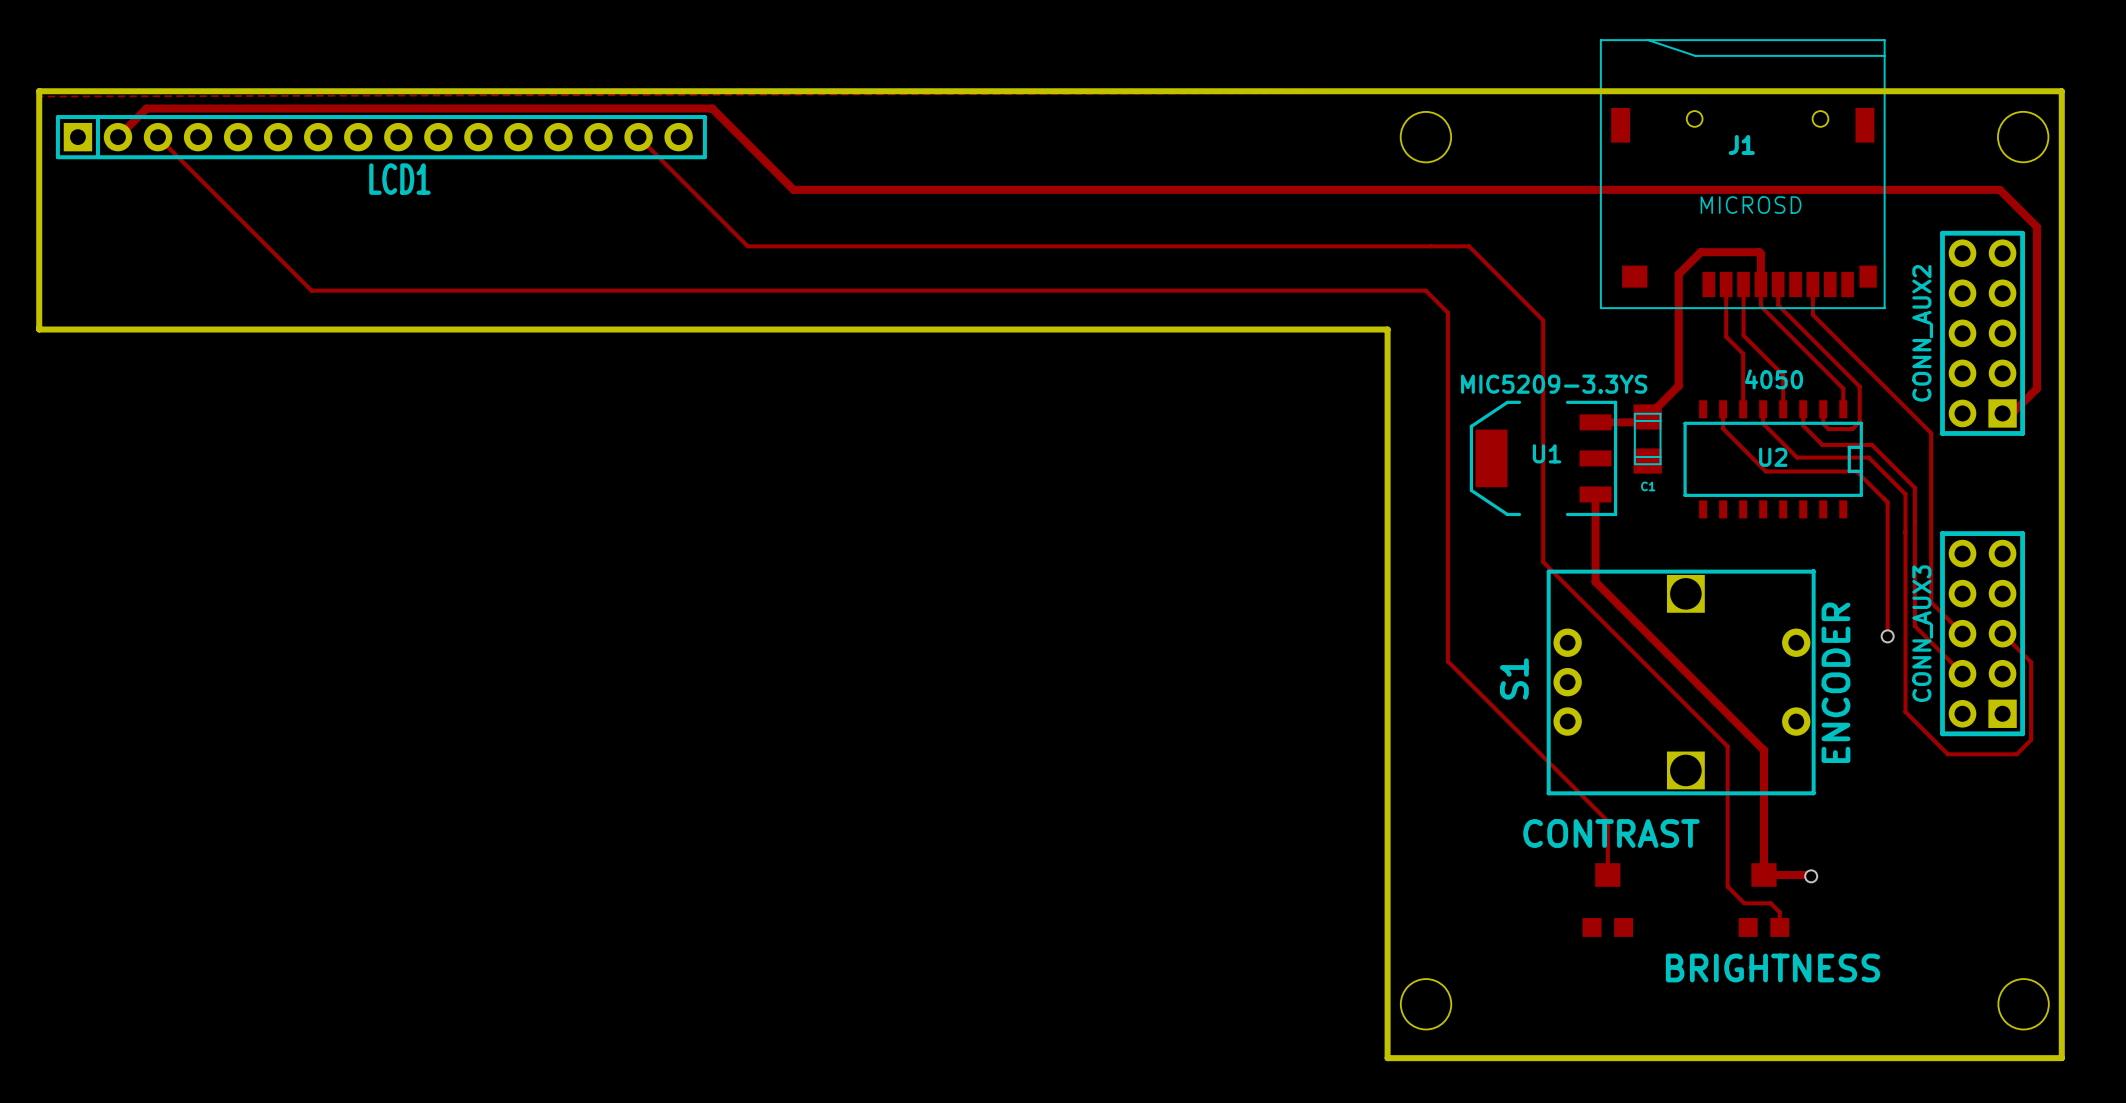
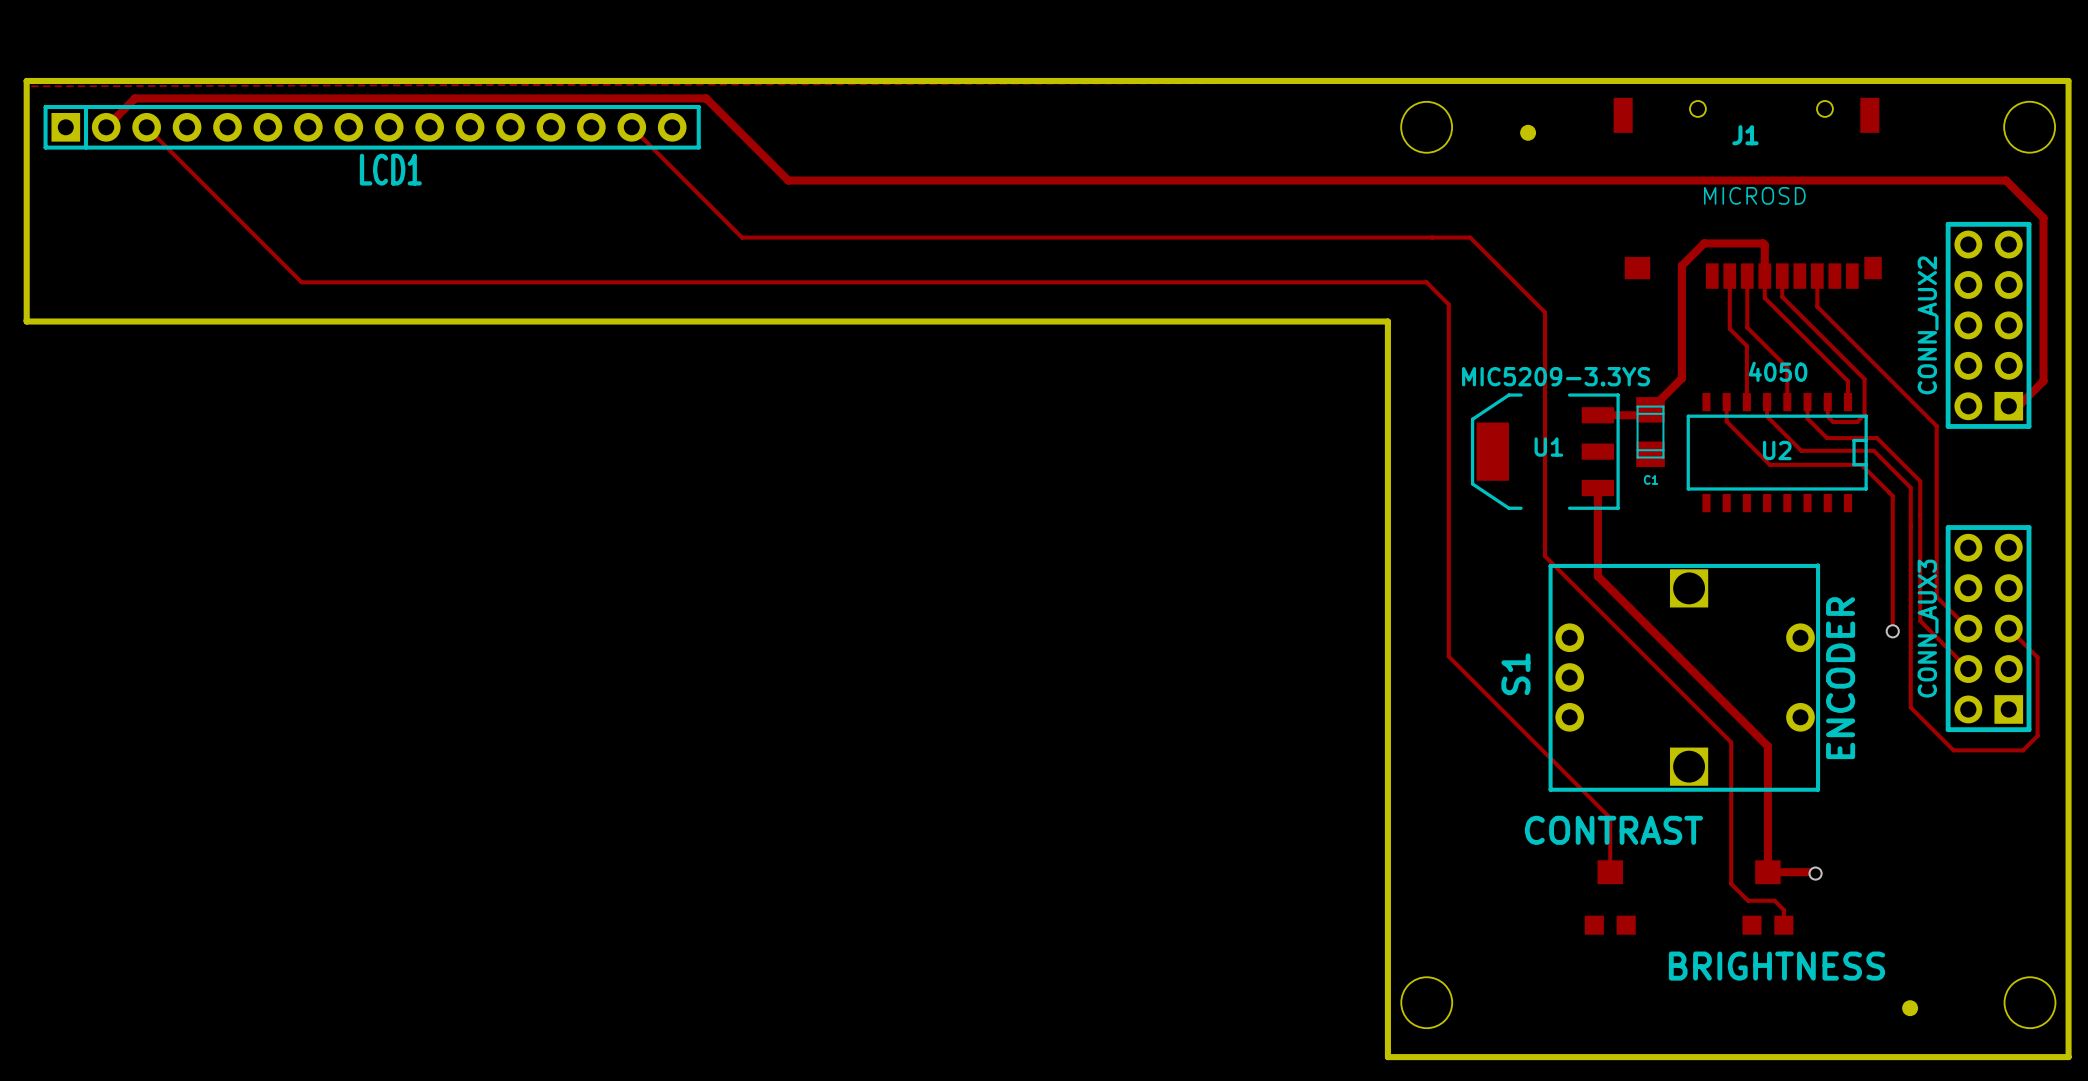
J1 footprint: [1599, 39, 1886, 310] -> [1613, 97, 1882, 289]
part: none -> (1528, 132)
part: none -> (1910, 1008)

